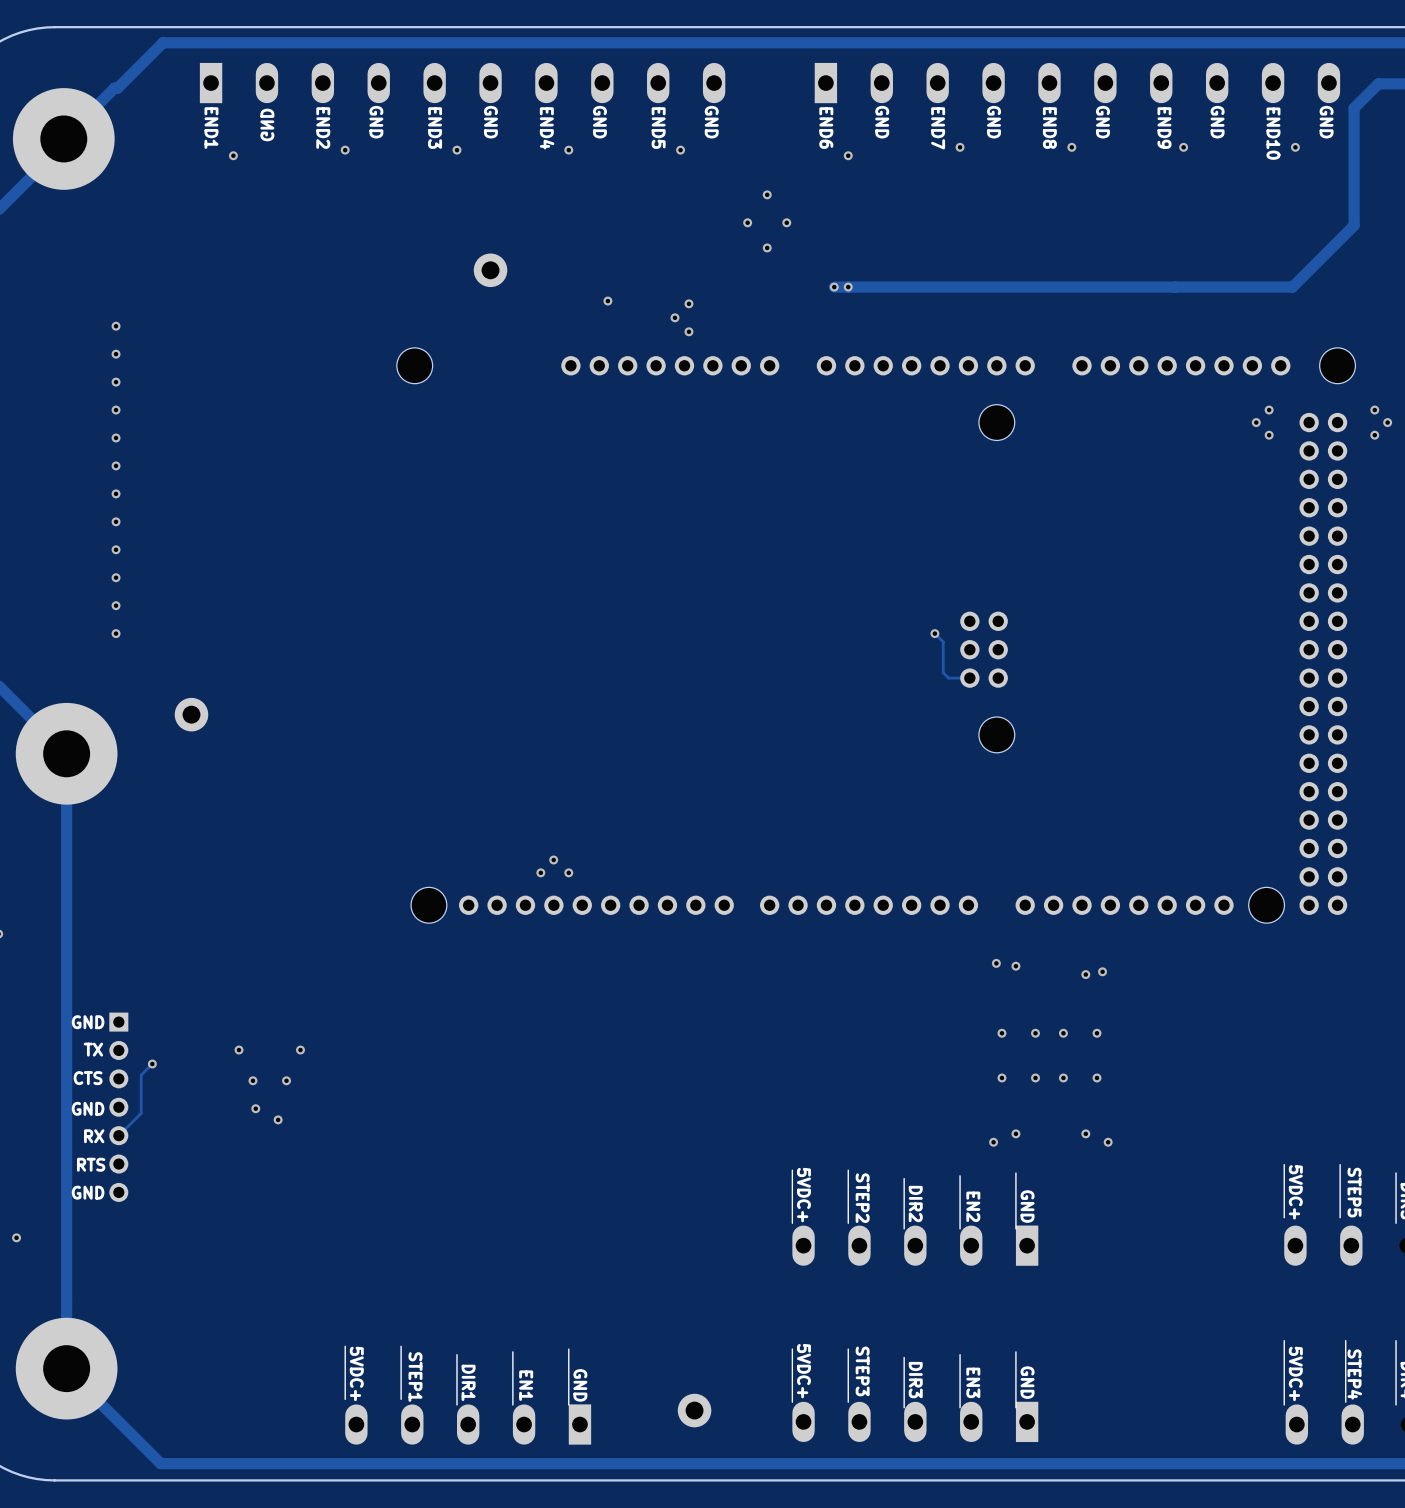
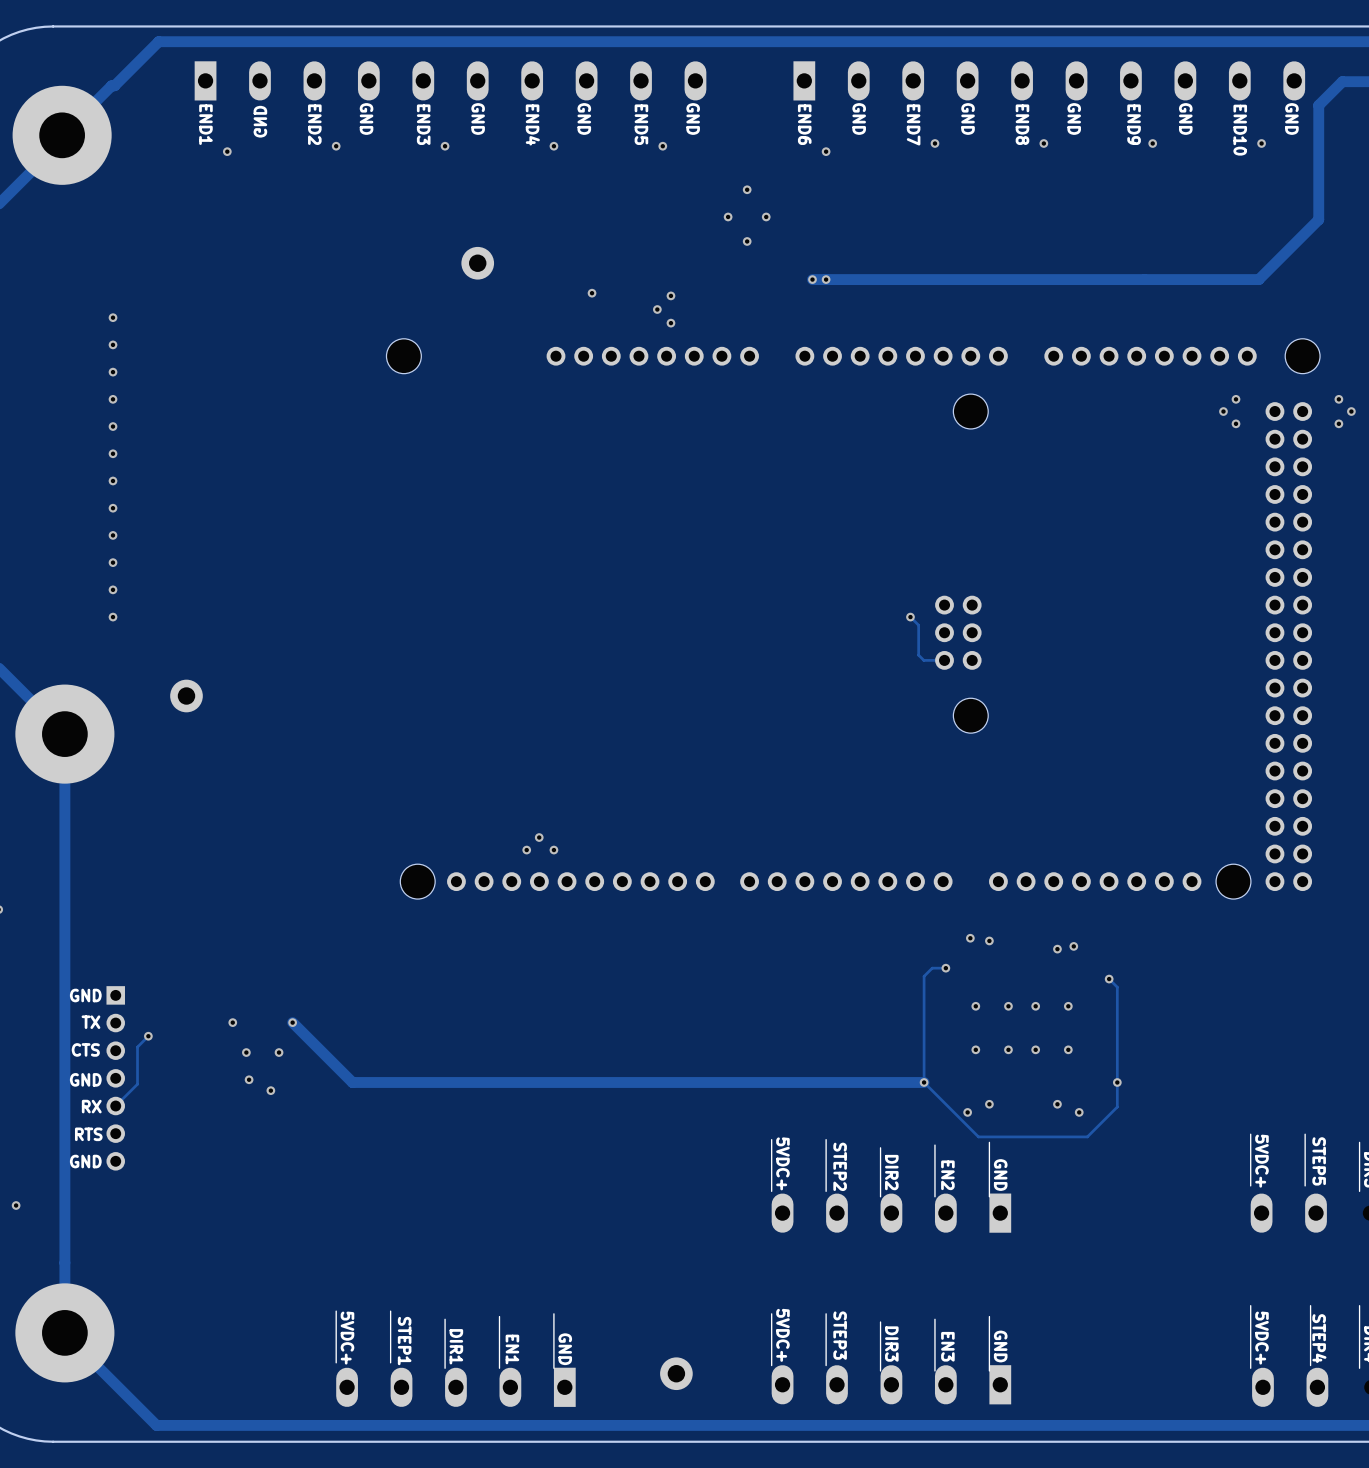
track: none -> (945, 968) (932, 968) (924, 976) (924, 1082)
via: none -> (945, 968)
track: none -> (1109, 979) (1117, 987) (1117, 1106) (1087, 1136) (978, 1136) (924, 1082)
via: none -> (1109, 979)
track: none -> (292, 1022) (352, 1082) (924, 1082)
via: none -> (924, 1082)
via: none -> (1117, 1082)

